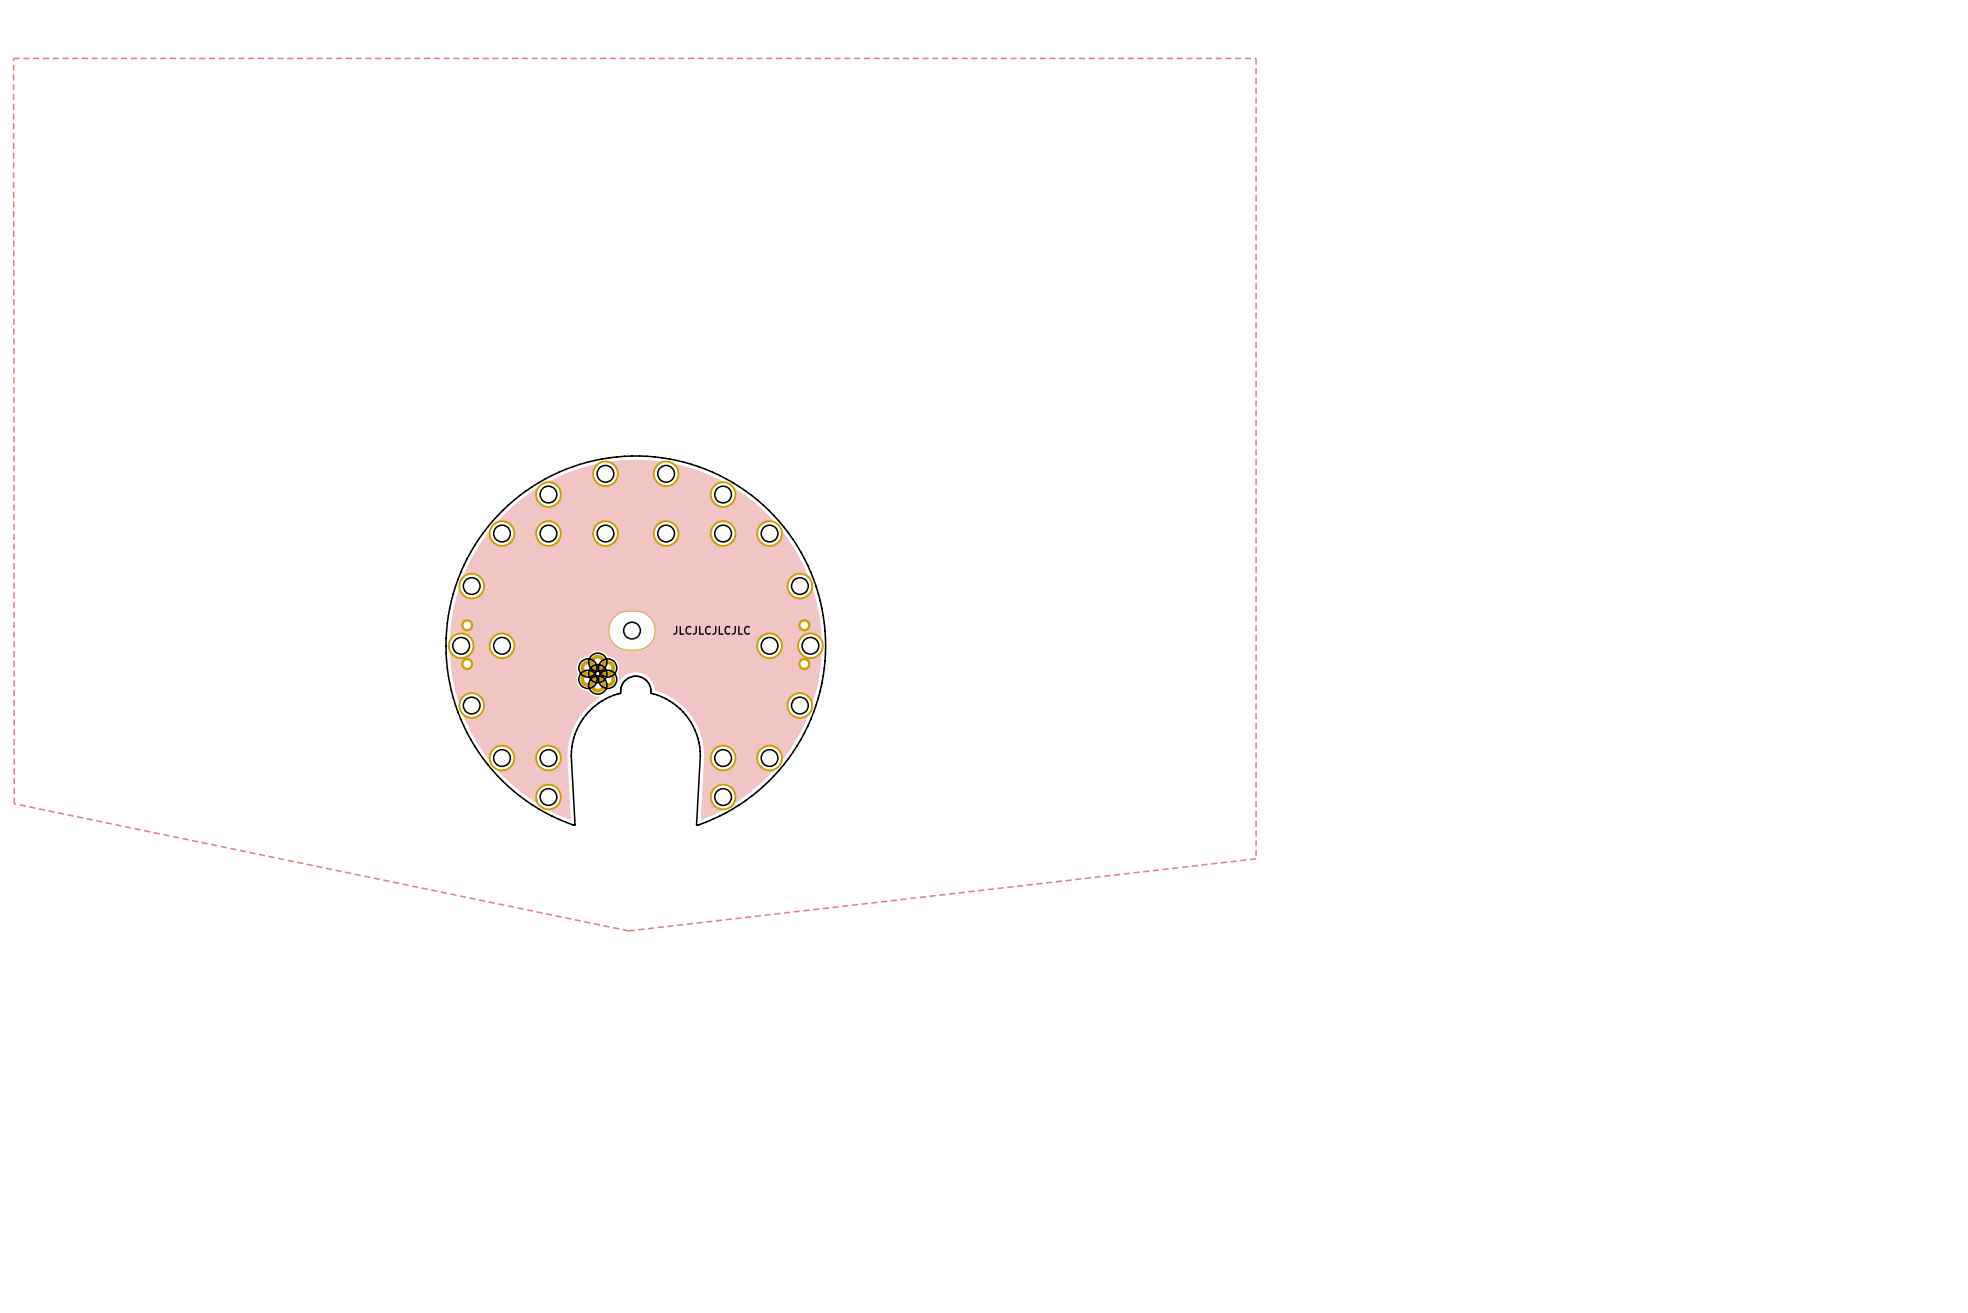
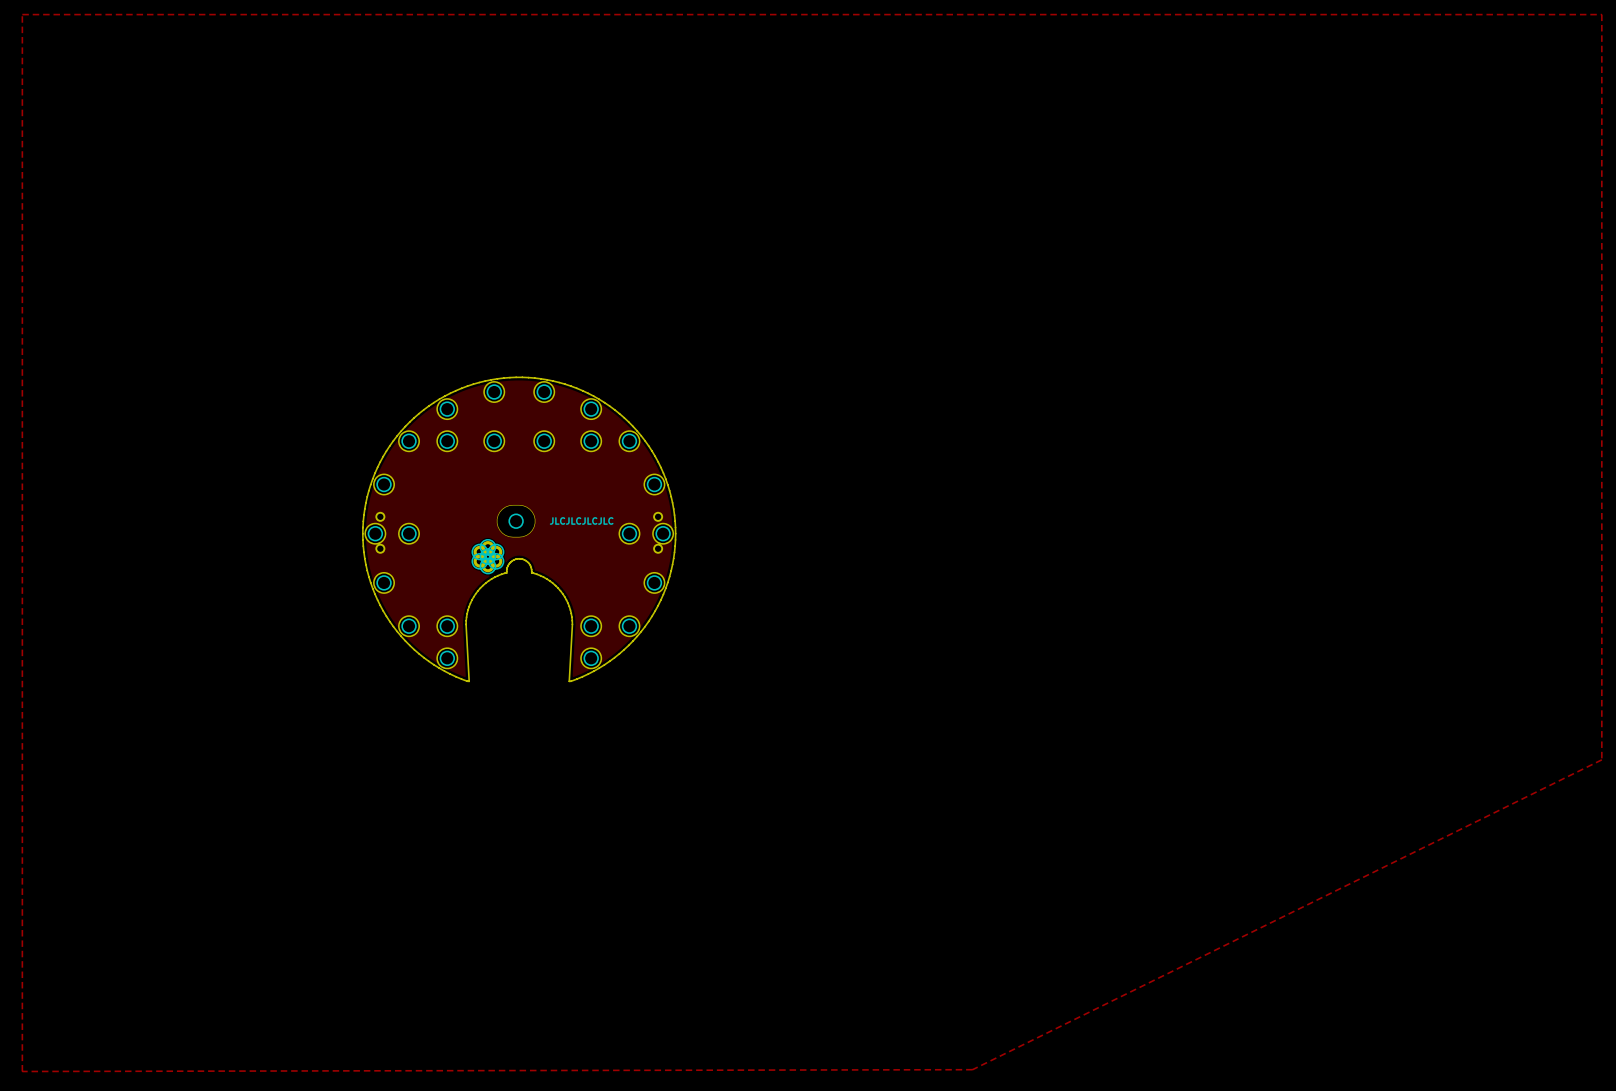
zone outline: none -> (22, 14) (1601, 14) (1601, 759) (972, 1069) (22, 1071) (22, 14)
zone outline: (13, 58) (1256, 58) (1256, 858) (628, 930) (14, 803) (13, 58) -> none

